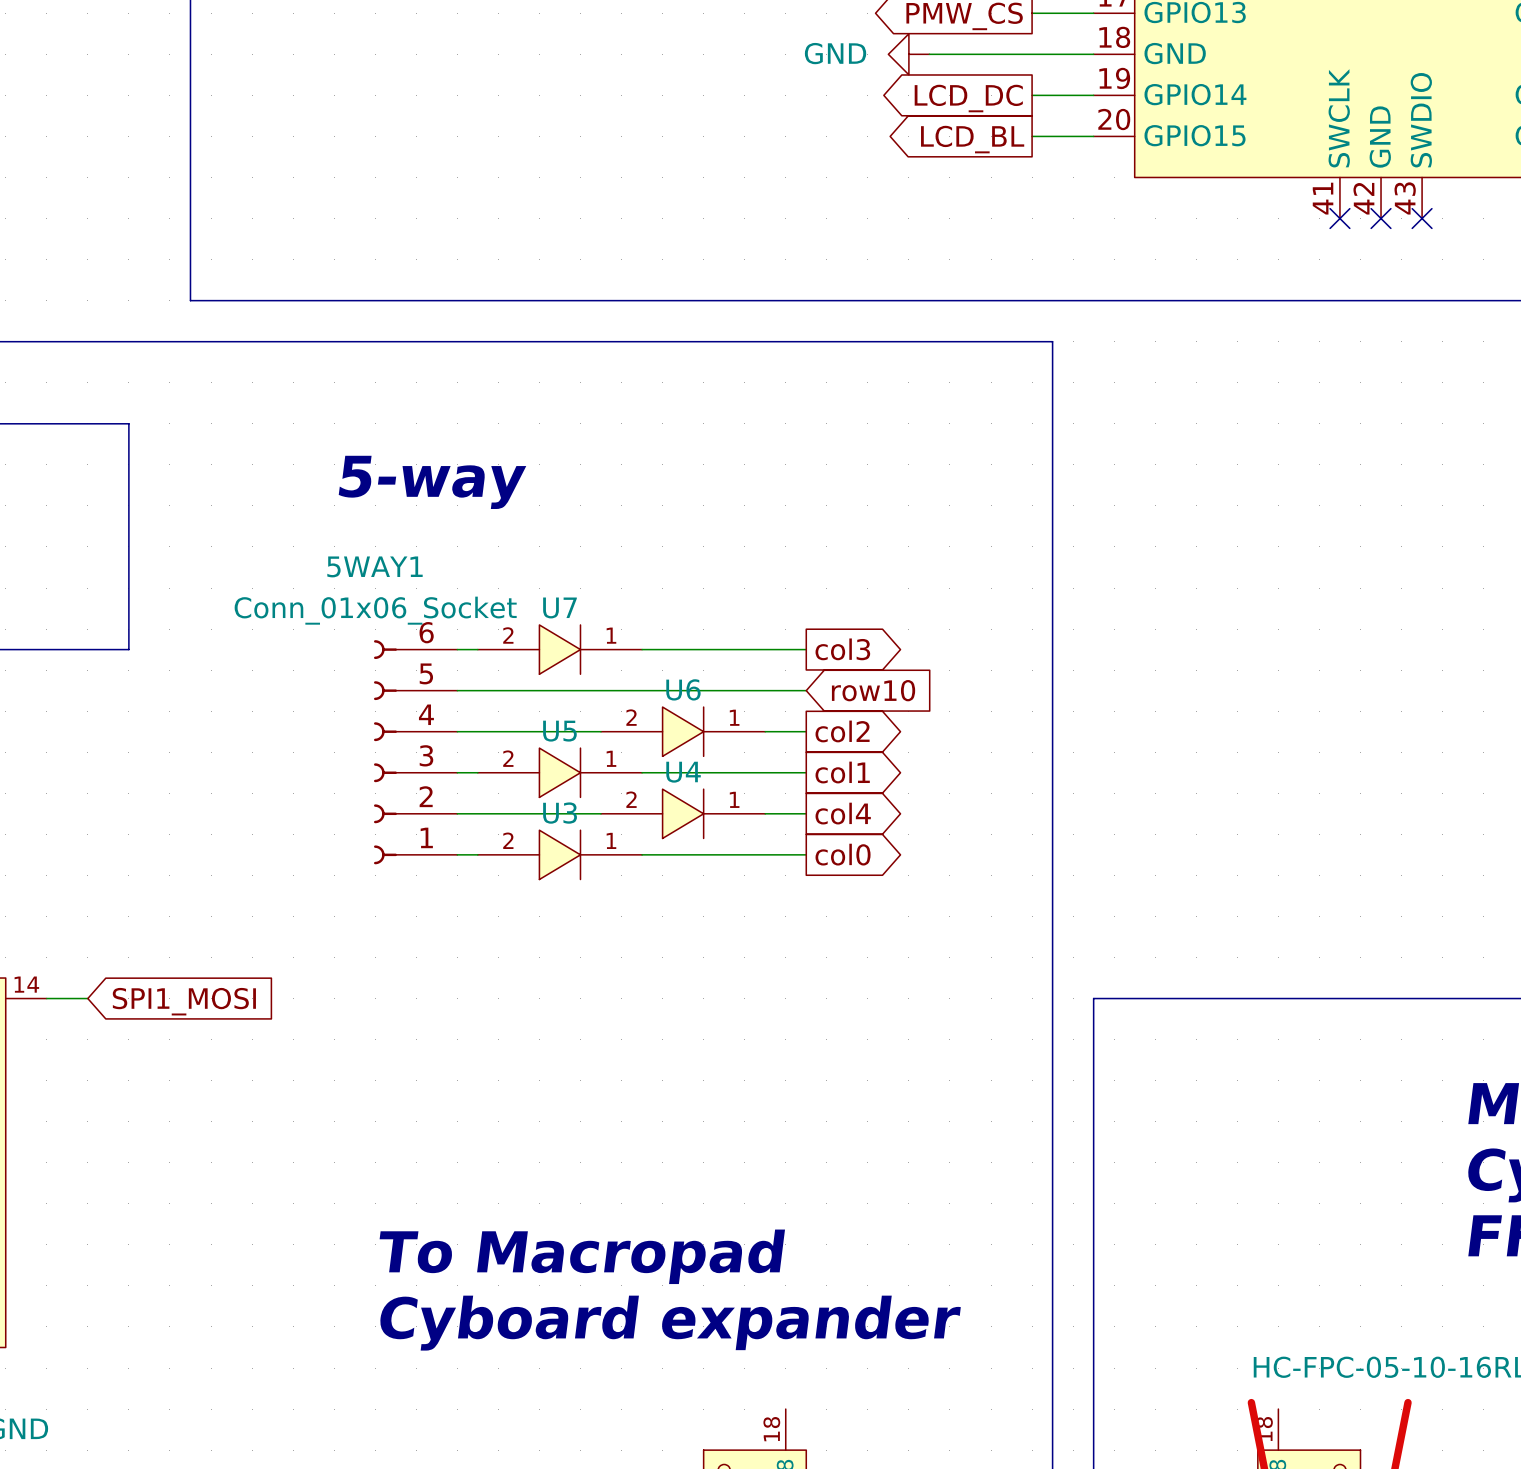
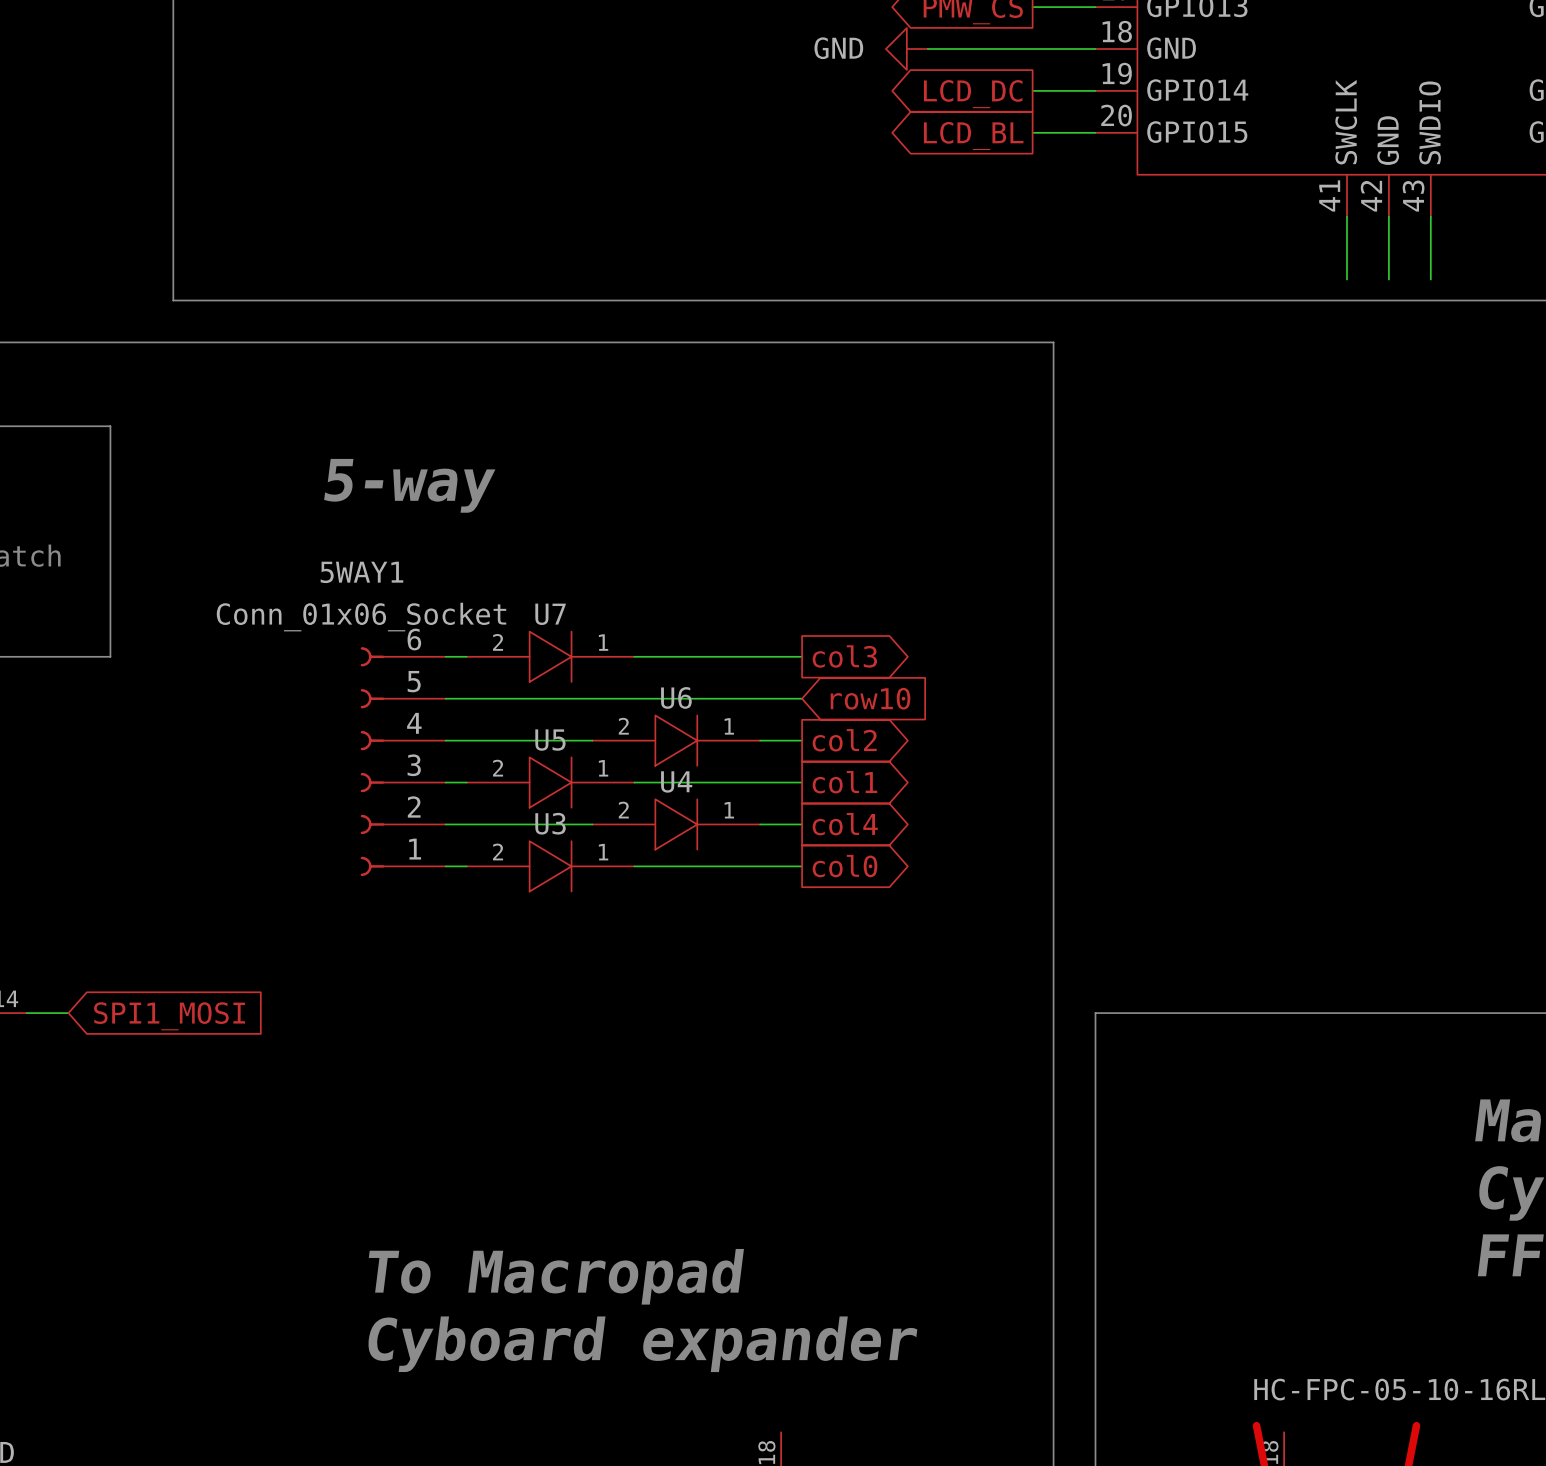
wire: none -> (1346, 216) (1346, 279)
no-connect mark: (1339, 218) -> none
wire: none -> (1388, 216) (1388, 279)
no-connect mark: (1381, 218) -> none
wire: none -> (1430, 216) (1430, 279)
no-connect mark: (1422, 218) -> none

